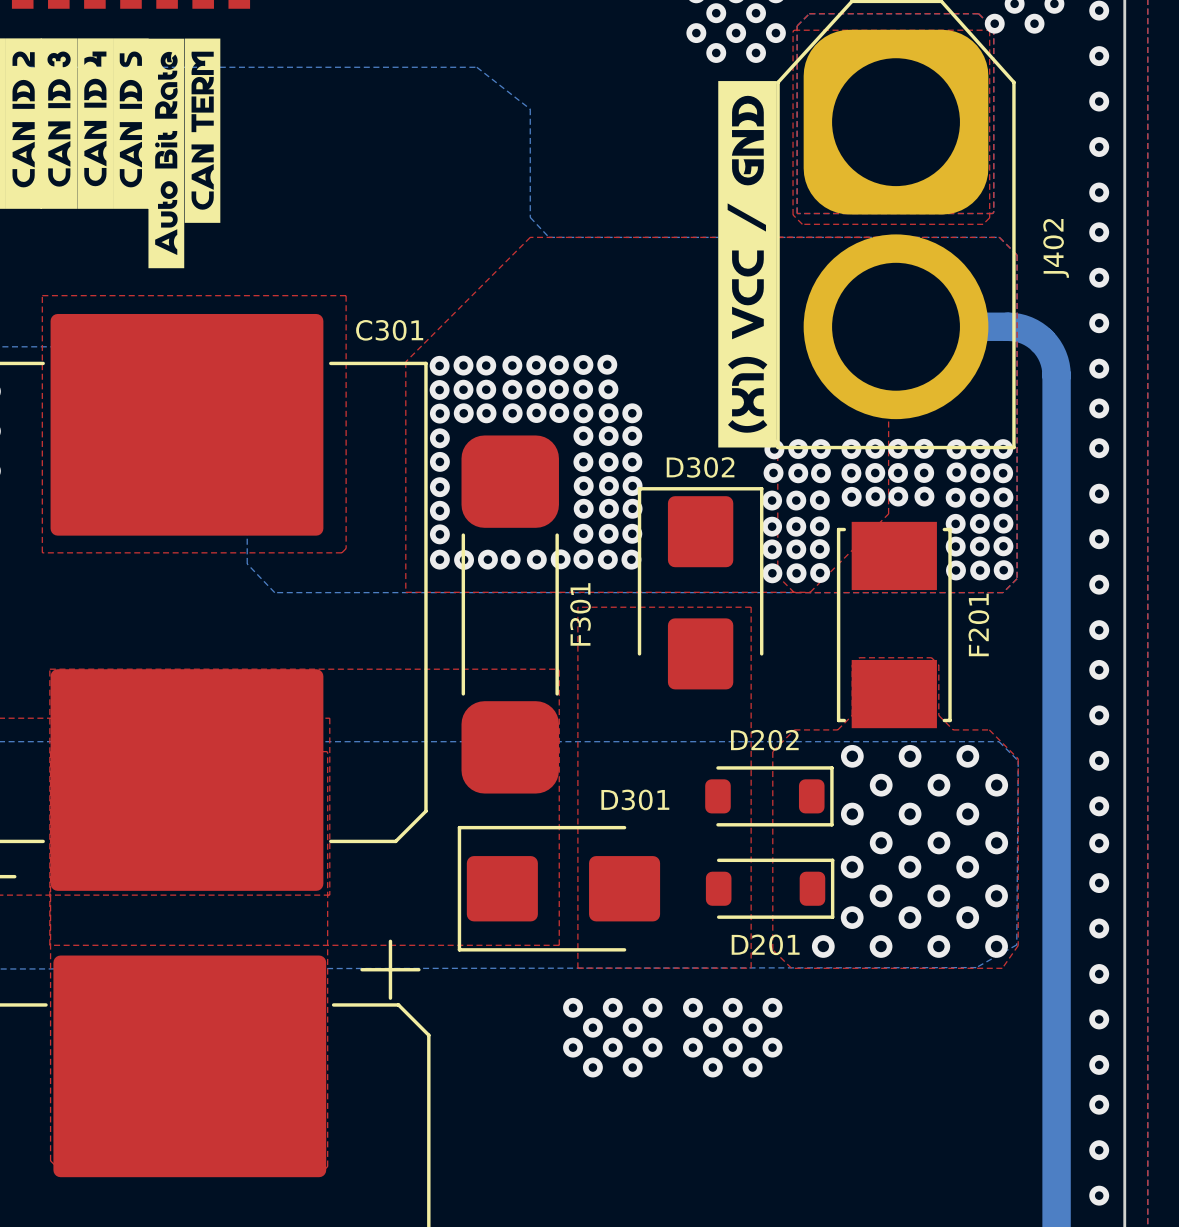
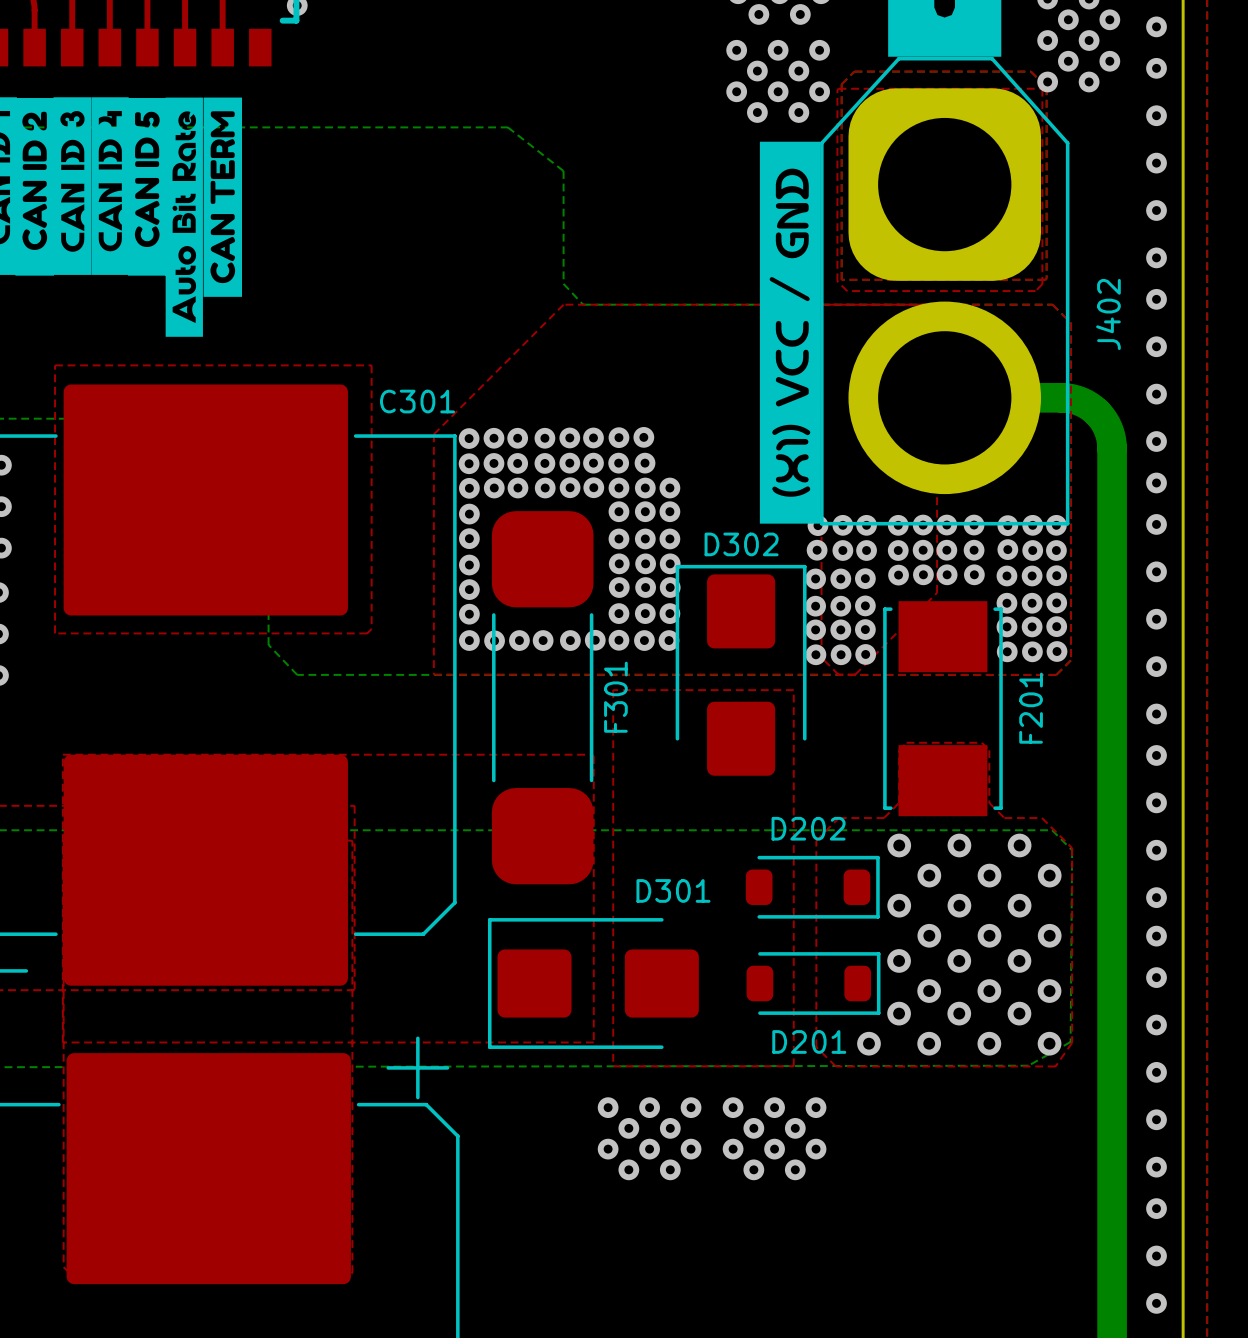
drawing shape: [5, 38, 42, 209] -> [15, 98, 54, 276]
drawing shape: [113, 38, 149, 209] -> [128, 98, 167, 276]
drawing shape: [184, 38, 221, 223] -> [203, 97, 242, 297]
drawing shape: [718, 81, 777, 448] -> [759, 141, 821, 524]

